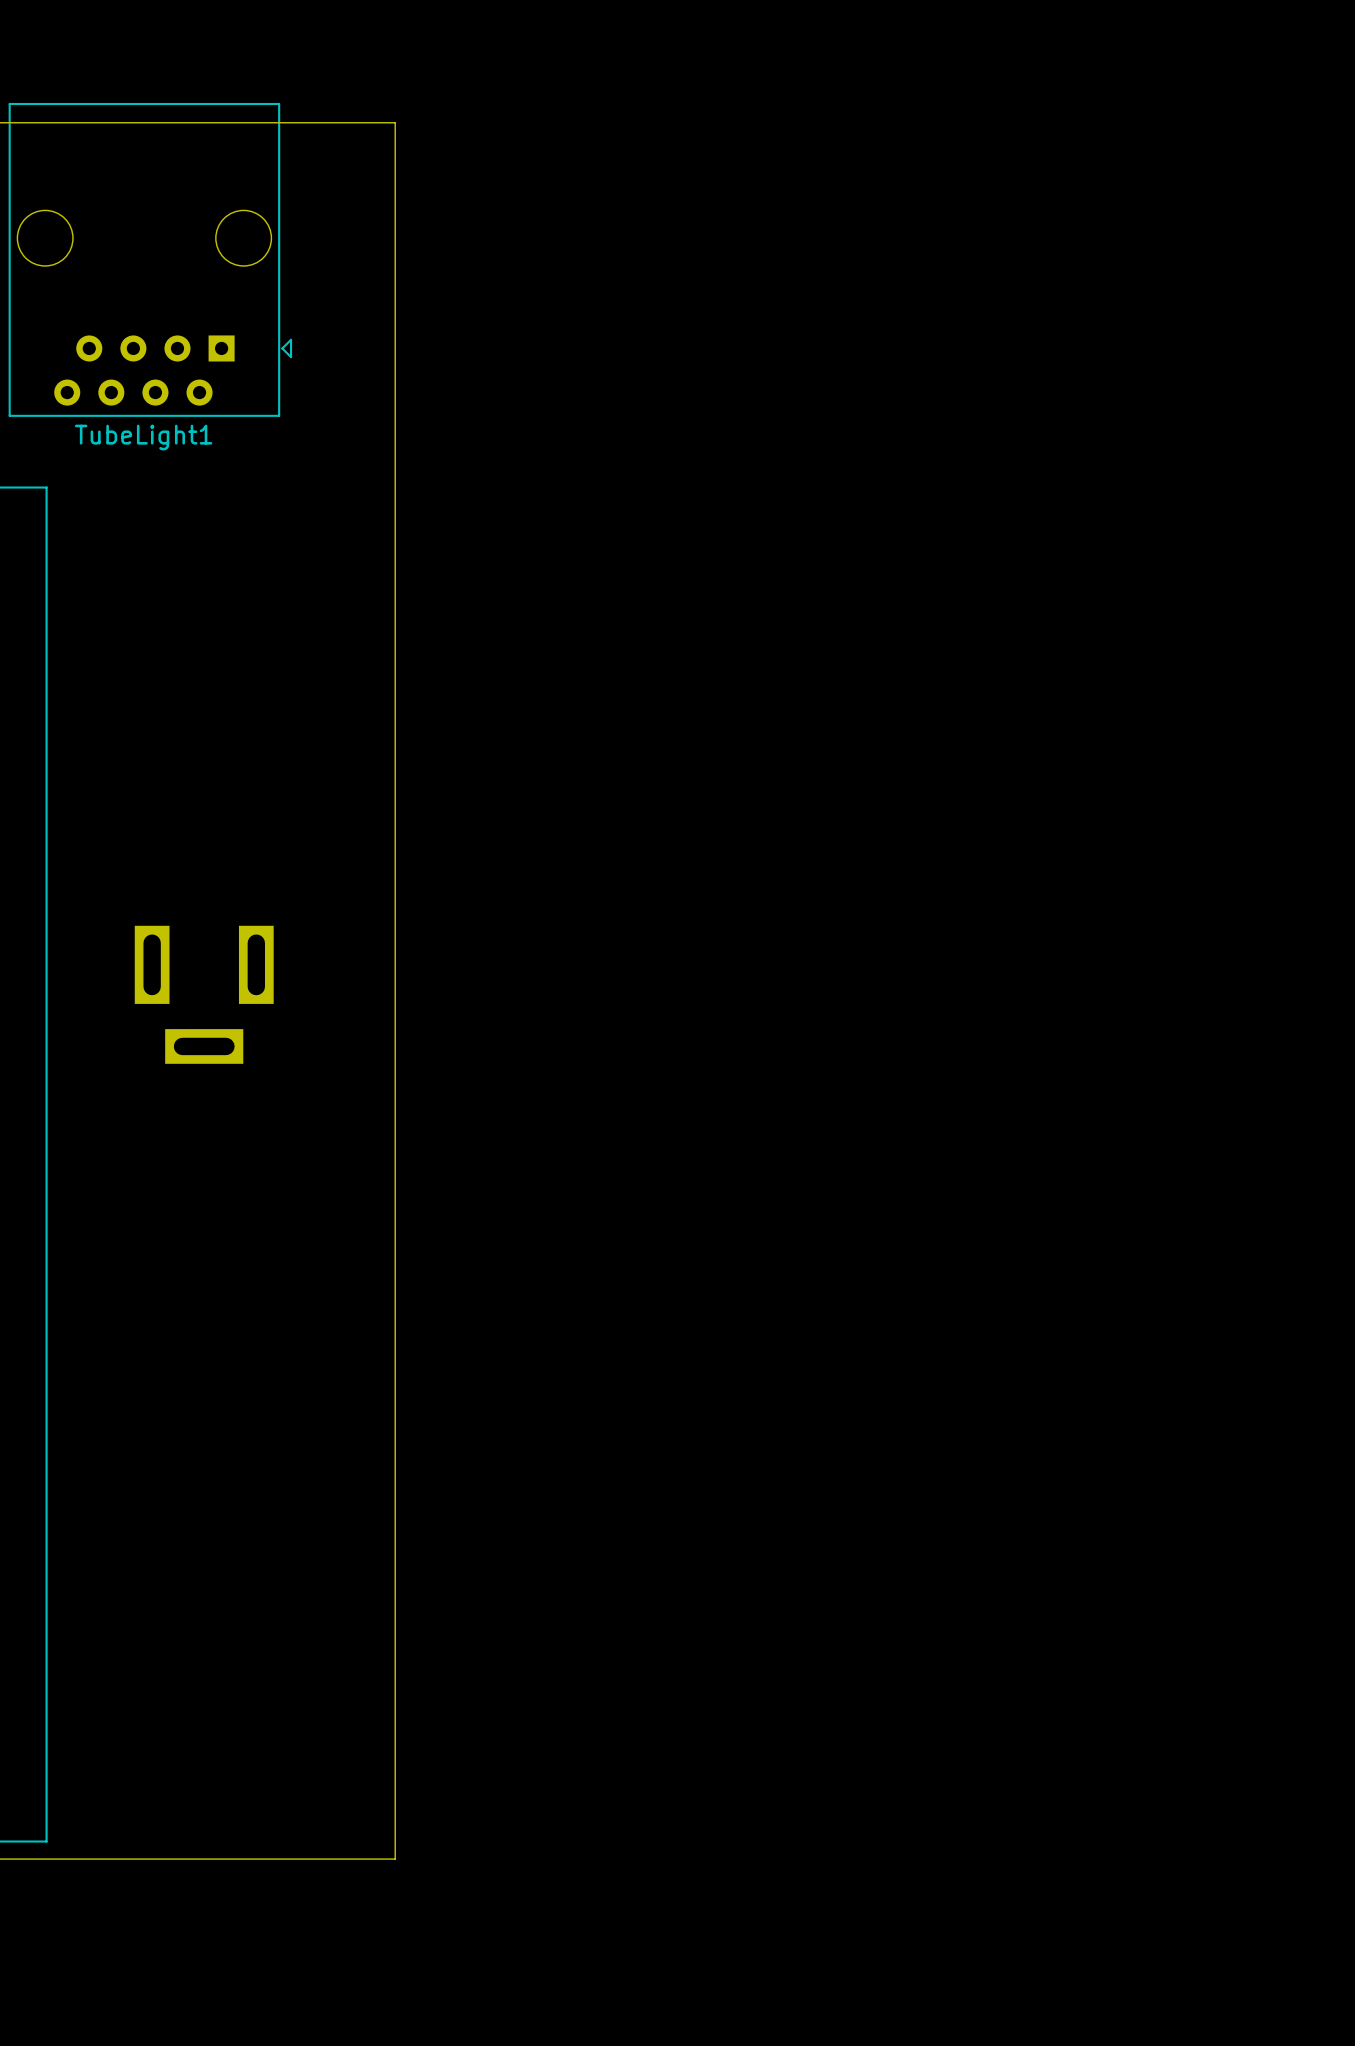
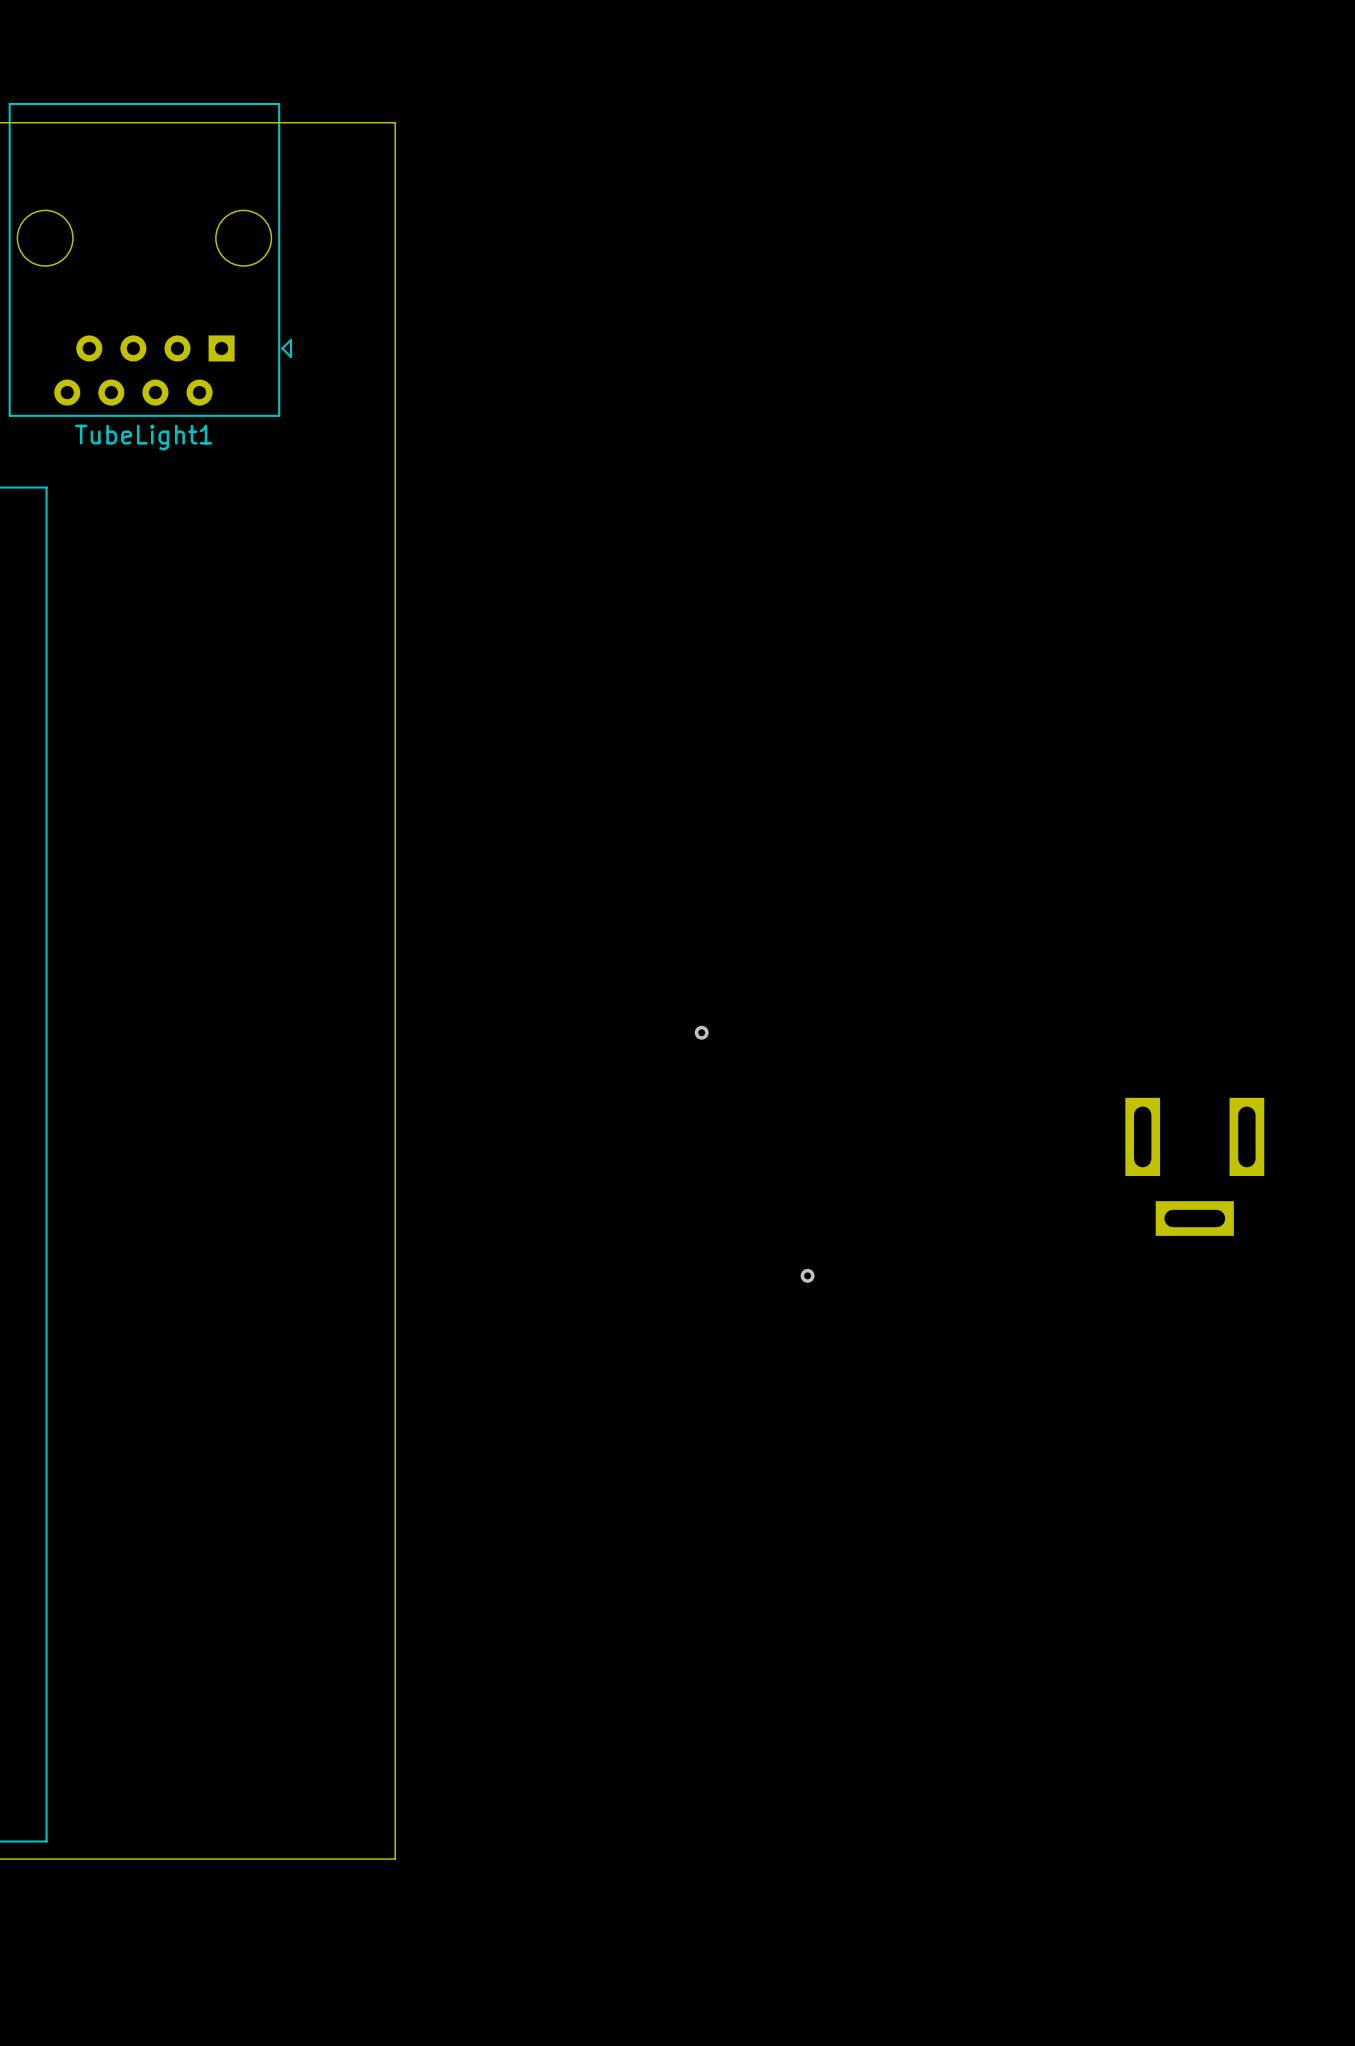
part: (204, 994) -> none
via: none -> (701, 1032)
part: none -> (1194, 1166)
via: none -> (807, 1275)

